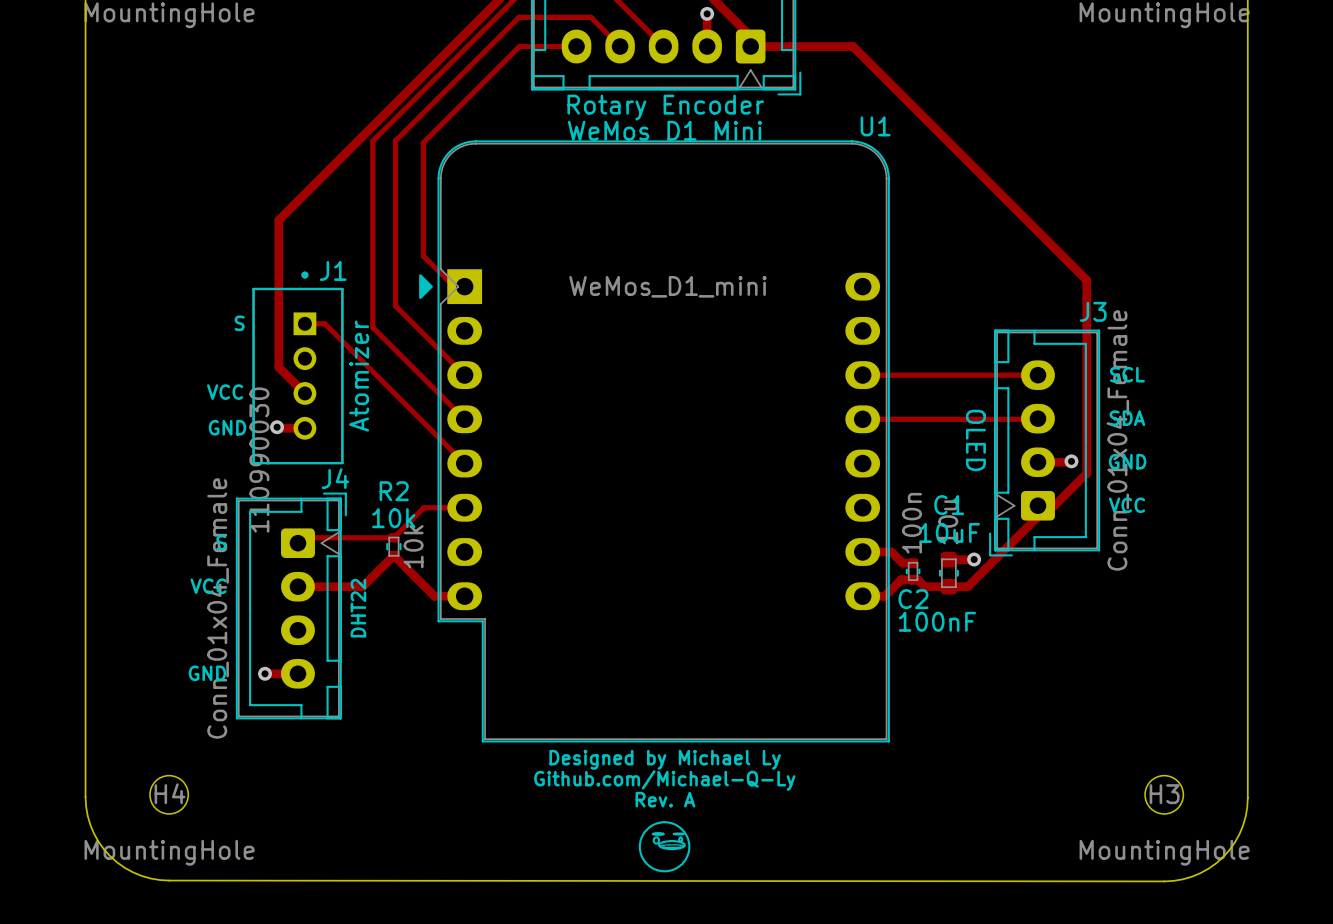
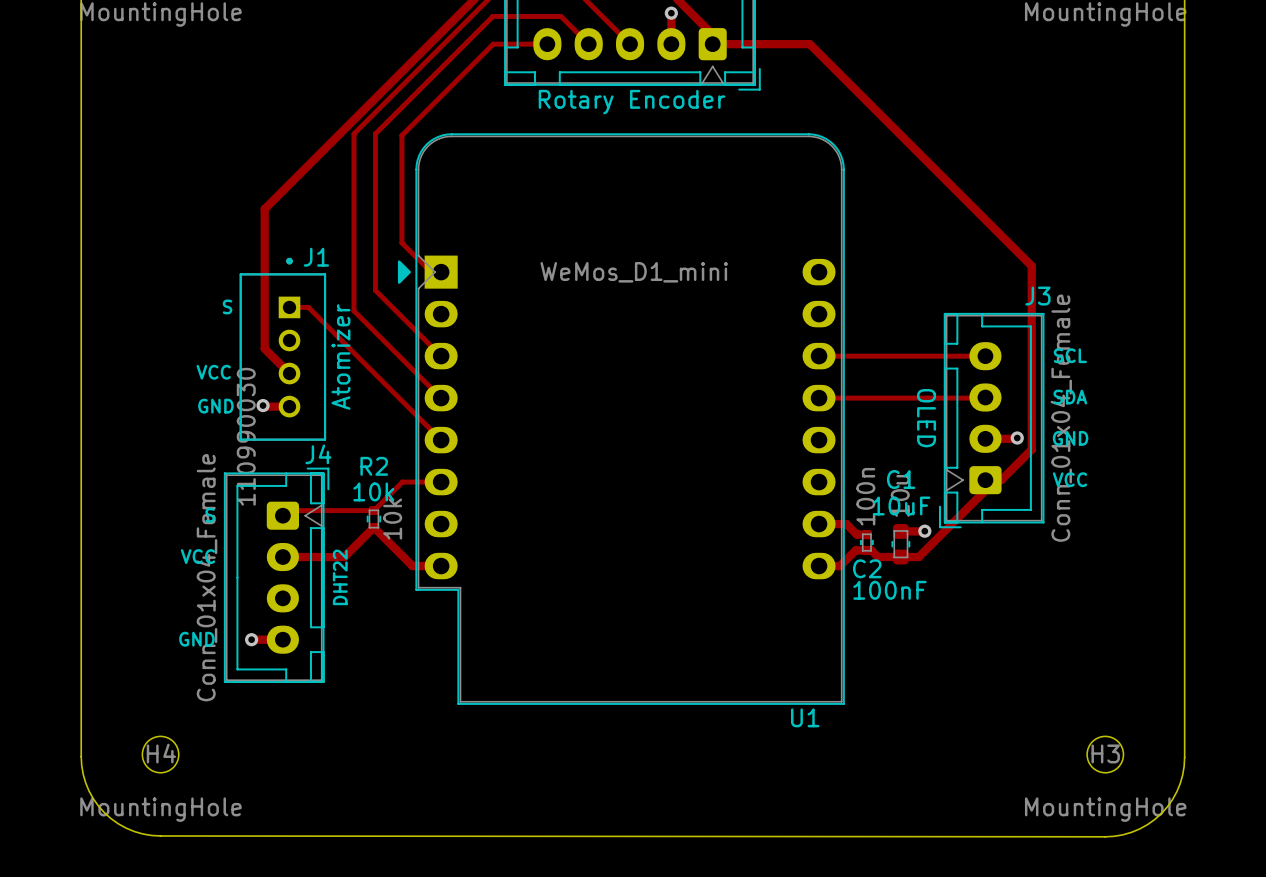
U1 name position: U1 (875, 126) -> U1 (805, 717)
text: WeMos D1 Mini (664, 130) -> none
text: Designed by Michael Ly (665, 759) -> none
text: Github.com/Michael-Q-Ly (664, 780) -> none
text: Rev. A (665, 799) -> none
drawing: [638, 821, 691, 873] -> none

